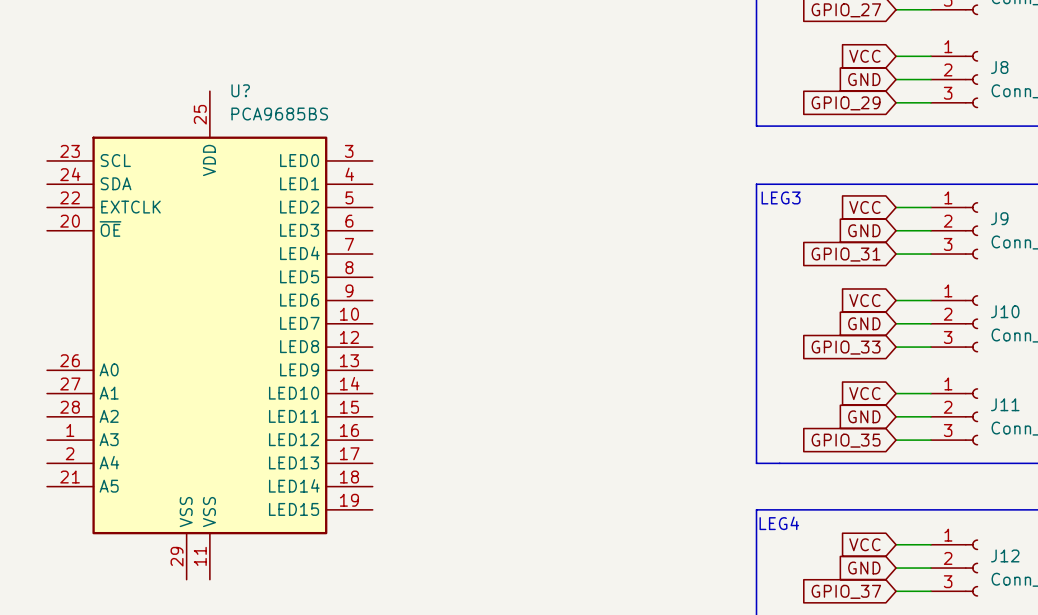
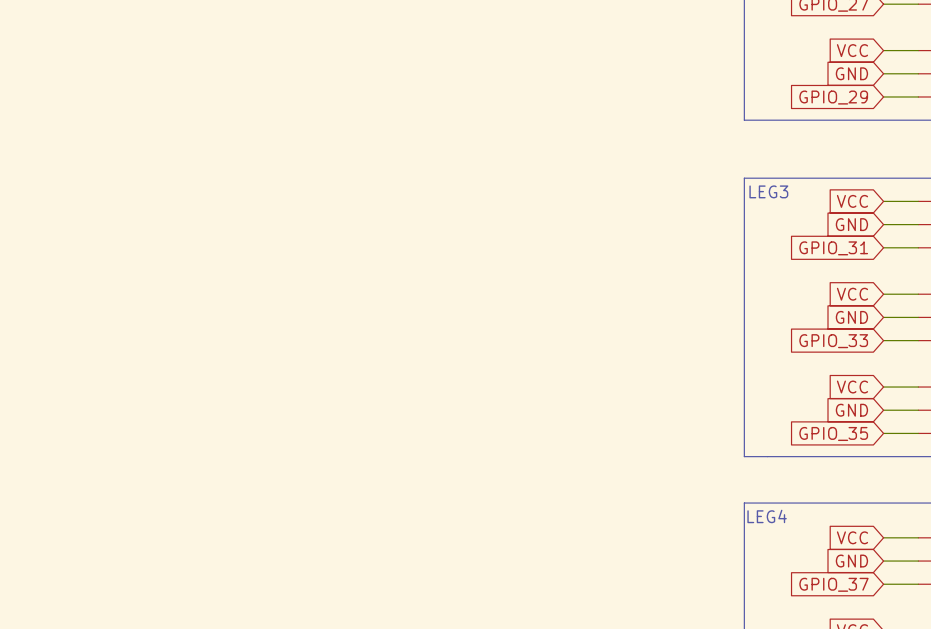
U?: PCA9685BS (209, 335) -> none

